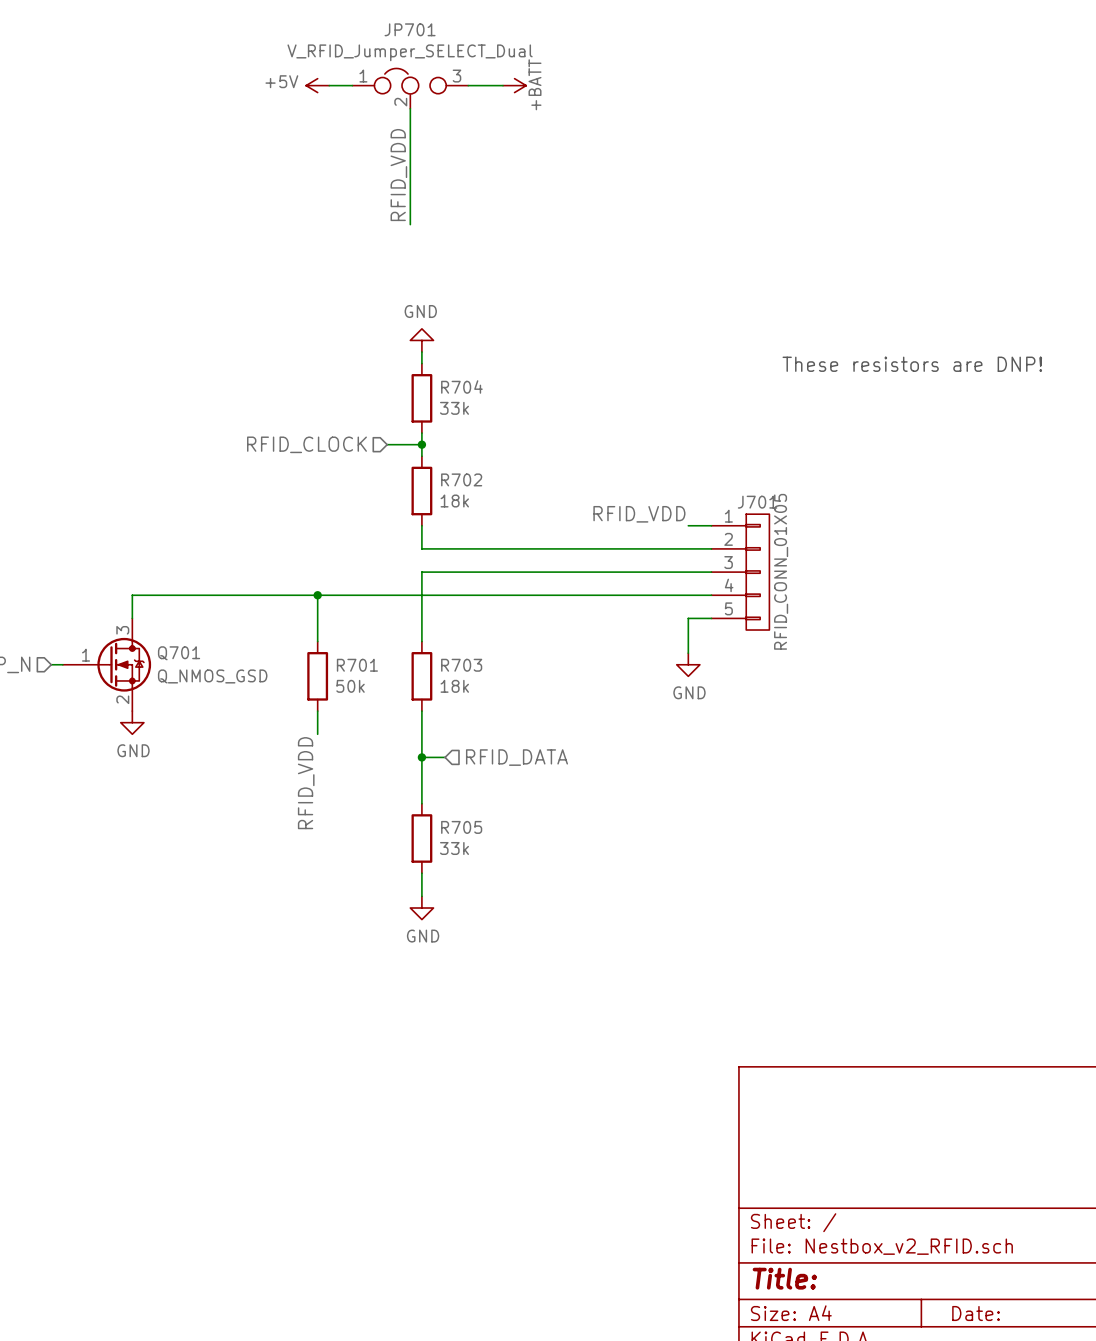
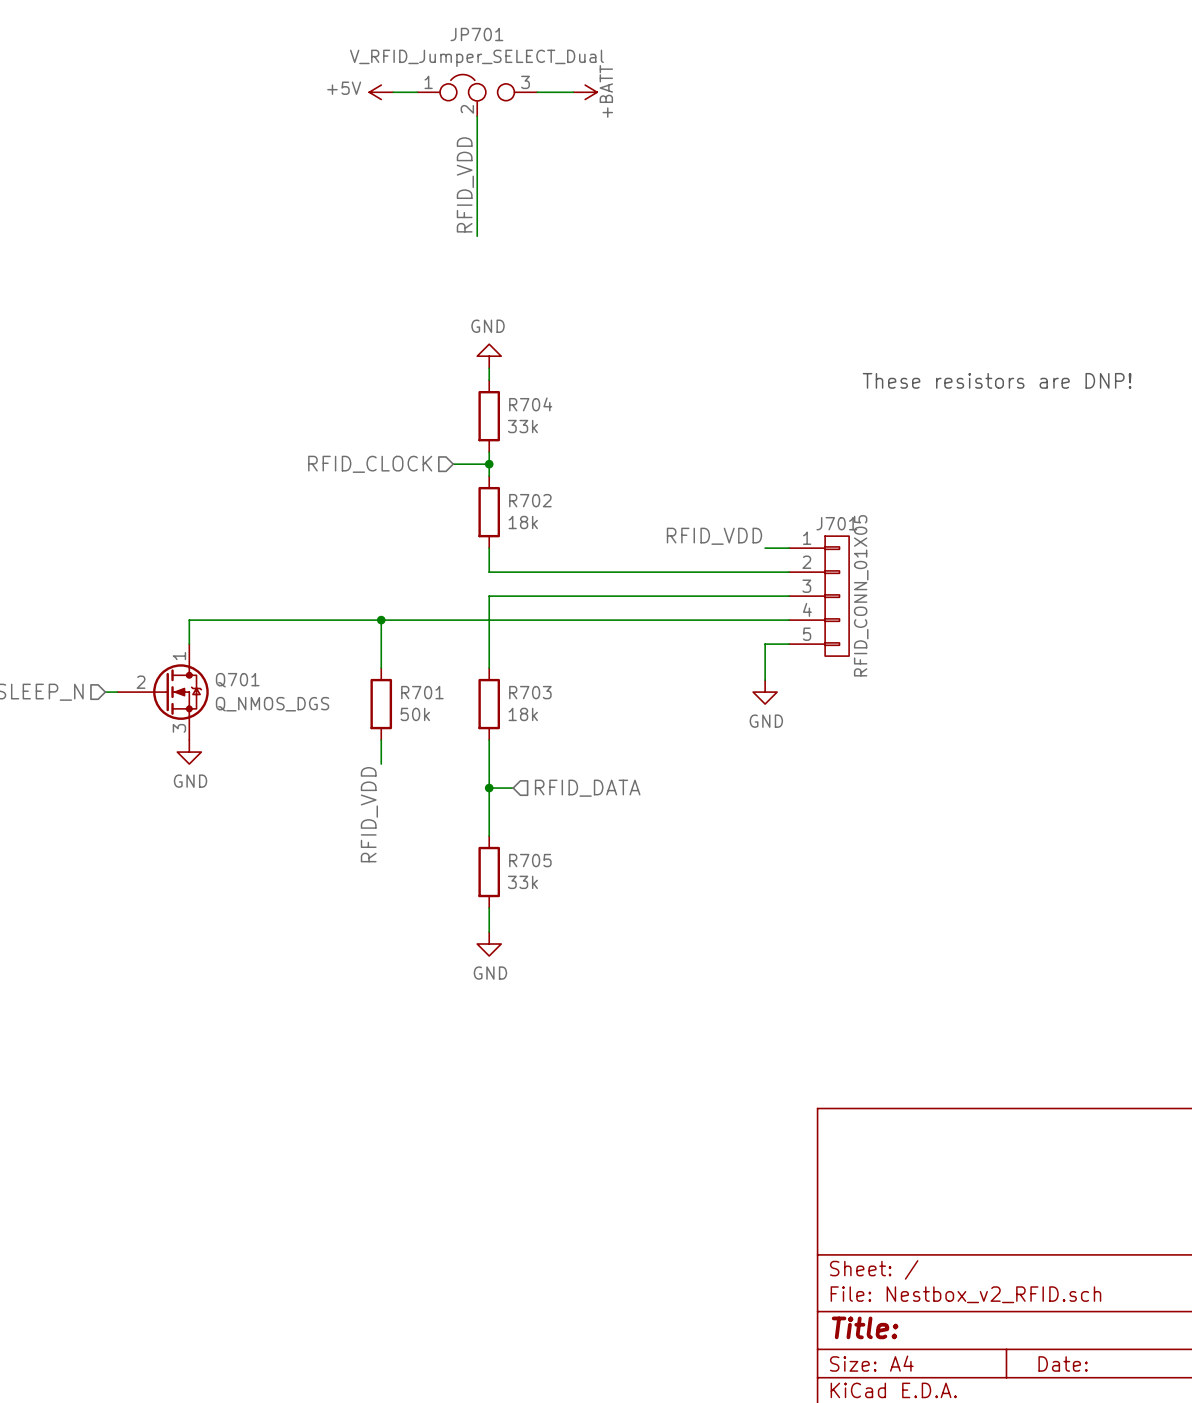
Q701 pin number: 3 (122, 630) -> 1 (179, 656)
Q701 pin number: 1 (86, 655) -> 2 (141, 682)
Q701 value: Q_NMOS_GSD (212, 676) -> Q_NMOS_DGS (272, 704)
Q701 pin number: 2 (122, 699) -> 3 (179, 728)

